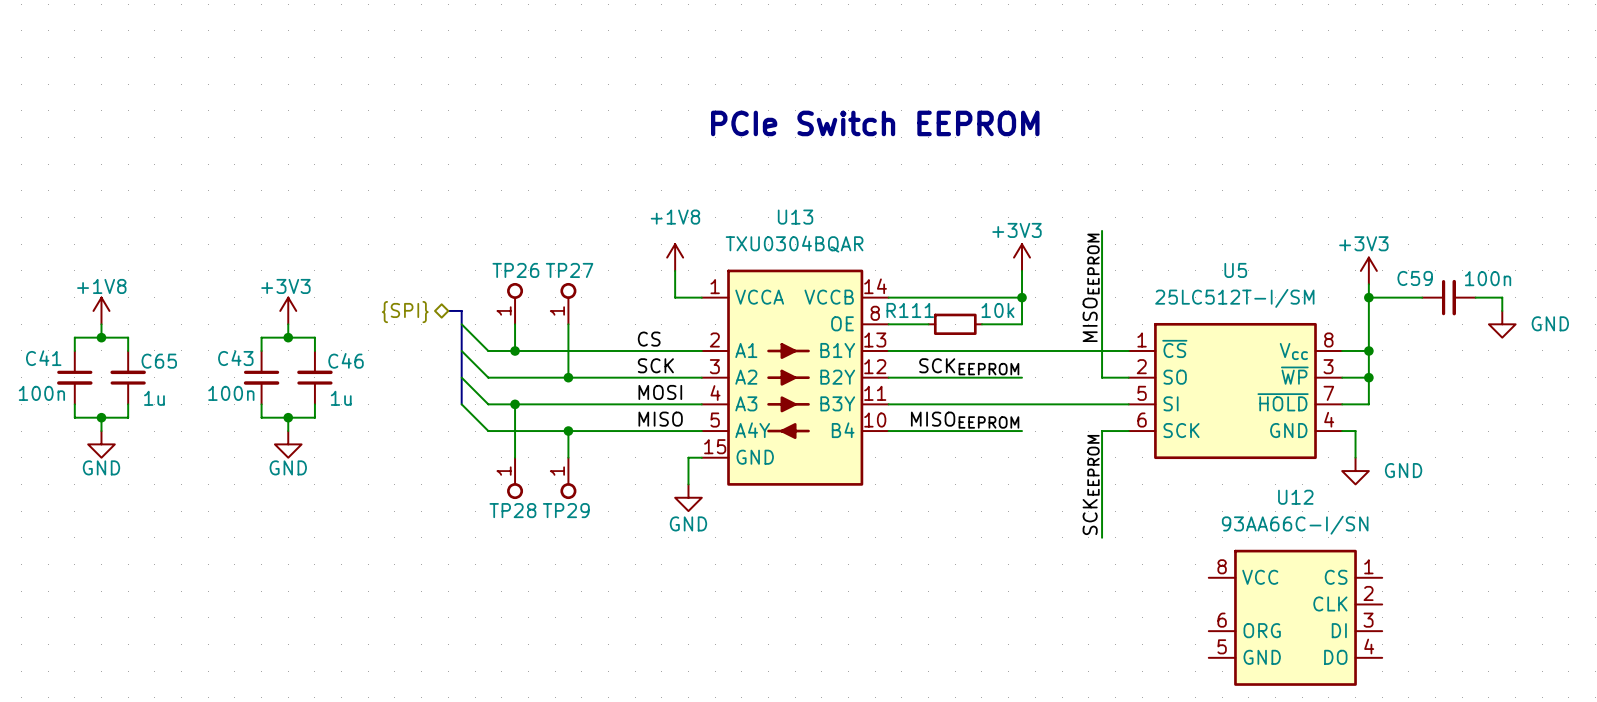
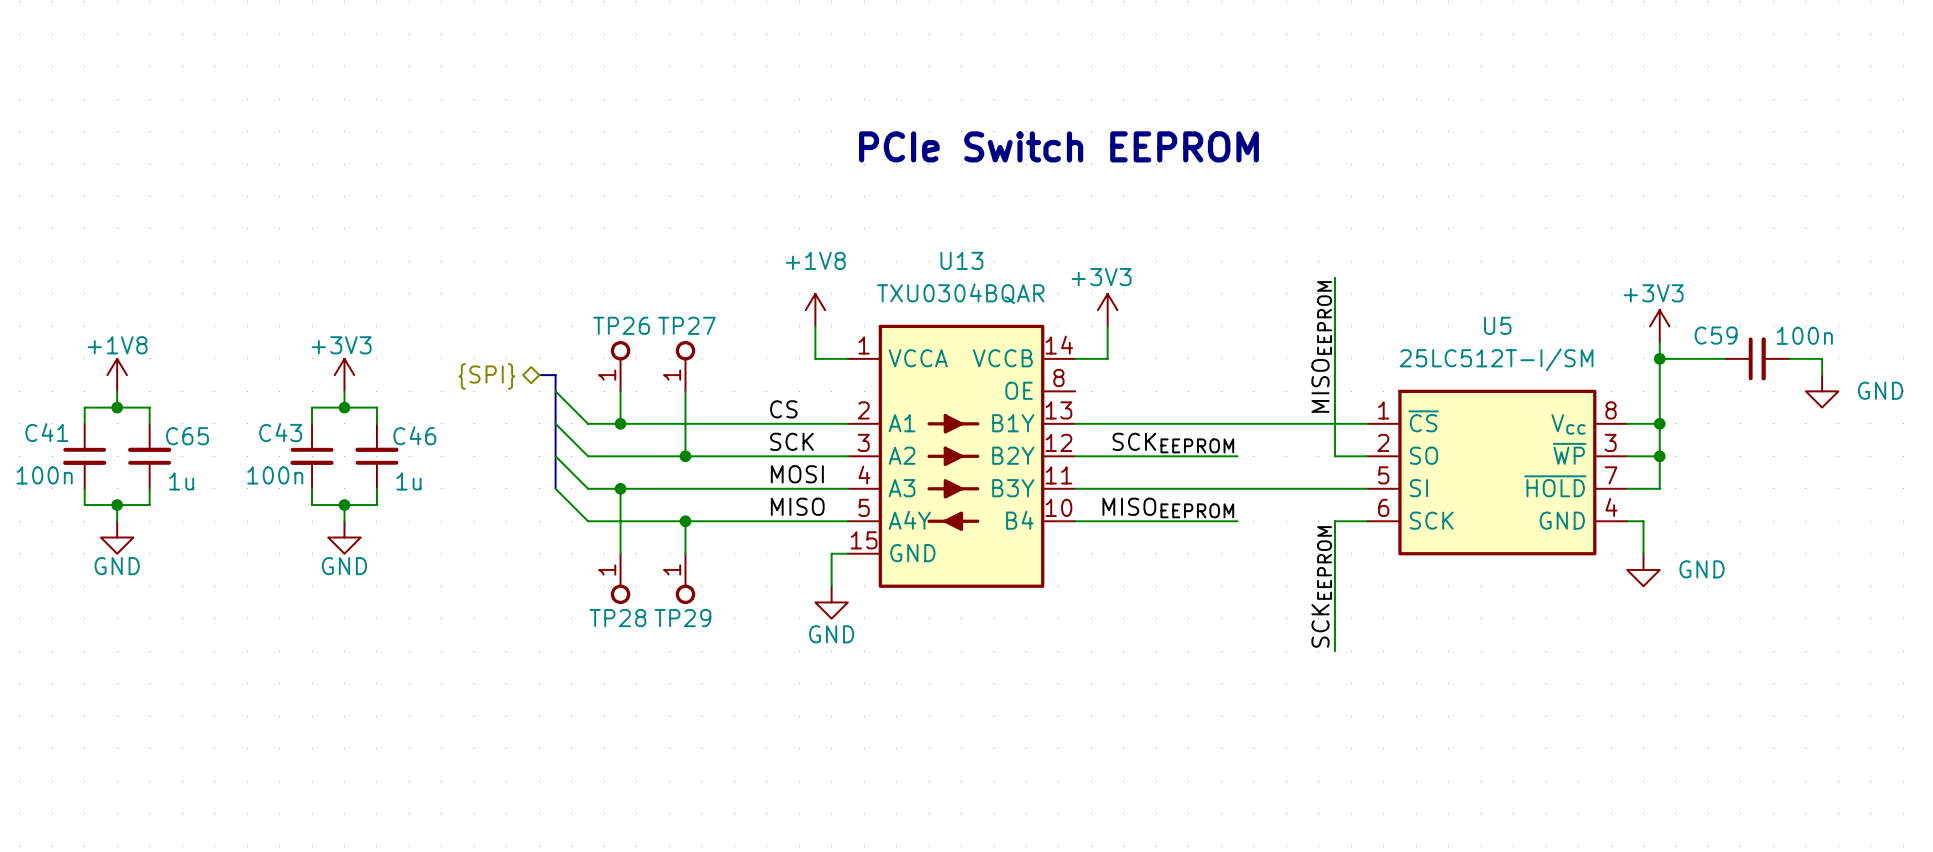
power symbol position: +3V3 (1022, 257) -> +3V3 (1107, 310)
wire: (1022, 270) (1022, 324) (981, 324) -> none
wire: (915, 297) (1022, 297) -> (1107, 358) (1107, 326)
junction: (1022, 297) -> none
wire: (888, 324) (928, 324) -> none
R111: (955, 324) -> none
U12: (1295, 617) -> none

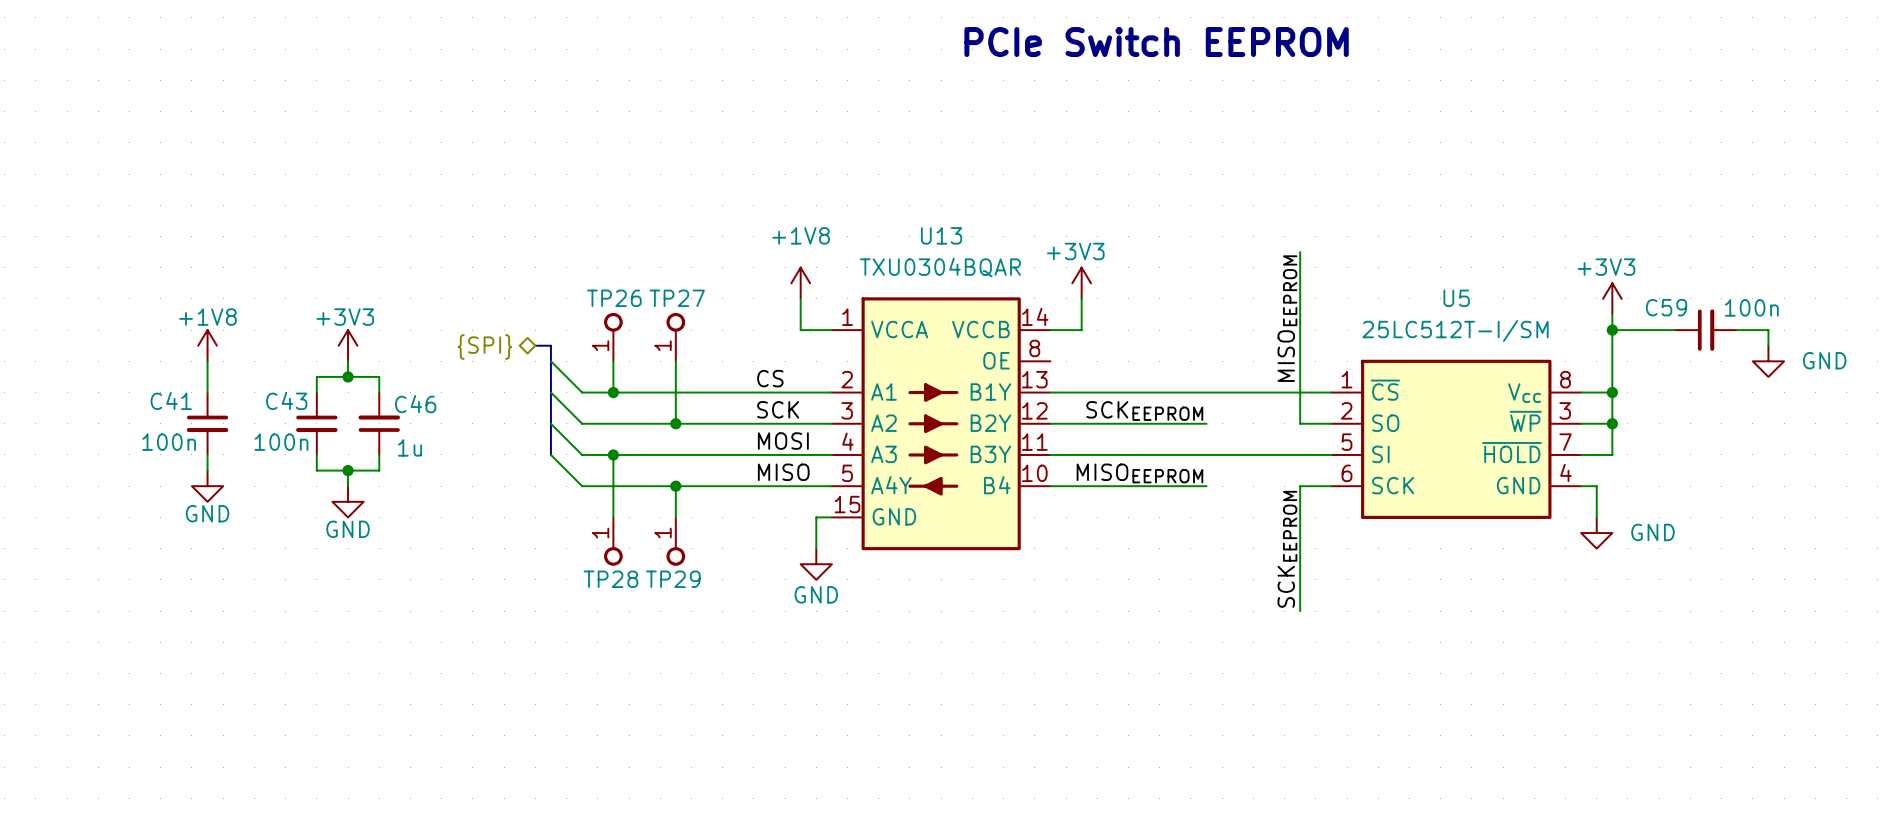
text position: PCIe Switch EEPROM (1058, 146) -> PCIe Switch EEPROM (1156, 42)
power symbol position: +1V8 (117, 375) -> +1V8 (207, 345)
wire: (117, 391) (117, 407) -> none
wire: none -> (207, 361) (207, 392)
junction: (117, 407) -> none
wire: (84, 423) (84, 407) (149, 407) (149, 423) -> none
C41 position: (84, 456) -> (207, 423)
C65: (149, 456) -> none
wire: (84, 488) (84, 505) (149, 505) (149, 488) -> none
wire: (117, 505) (117, 521) -> (207, 454) (207, 470)
junction: (117, 505) -> none
power symbol position: GND (117, 537) -> GND (207, 486)

